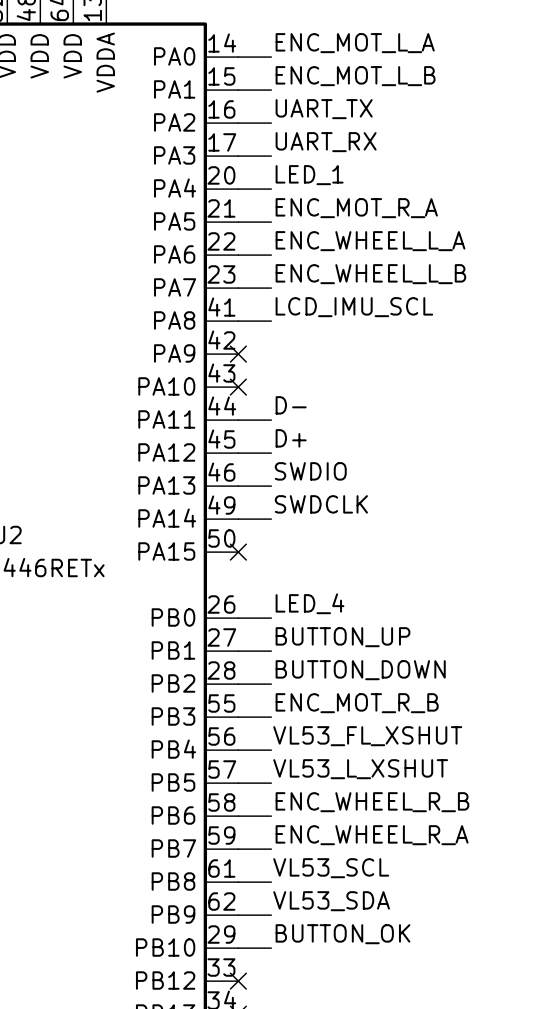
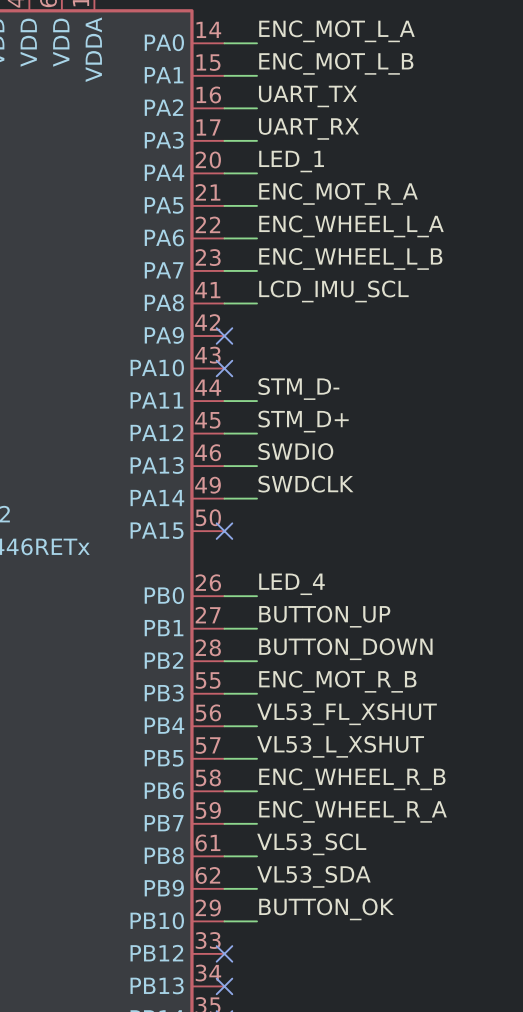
label: D- (291, 405) -> STM_D- (298, 389)
label: D+ (291, 438) -> STM_D+ (303, 421)

